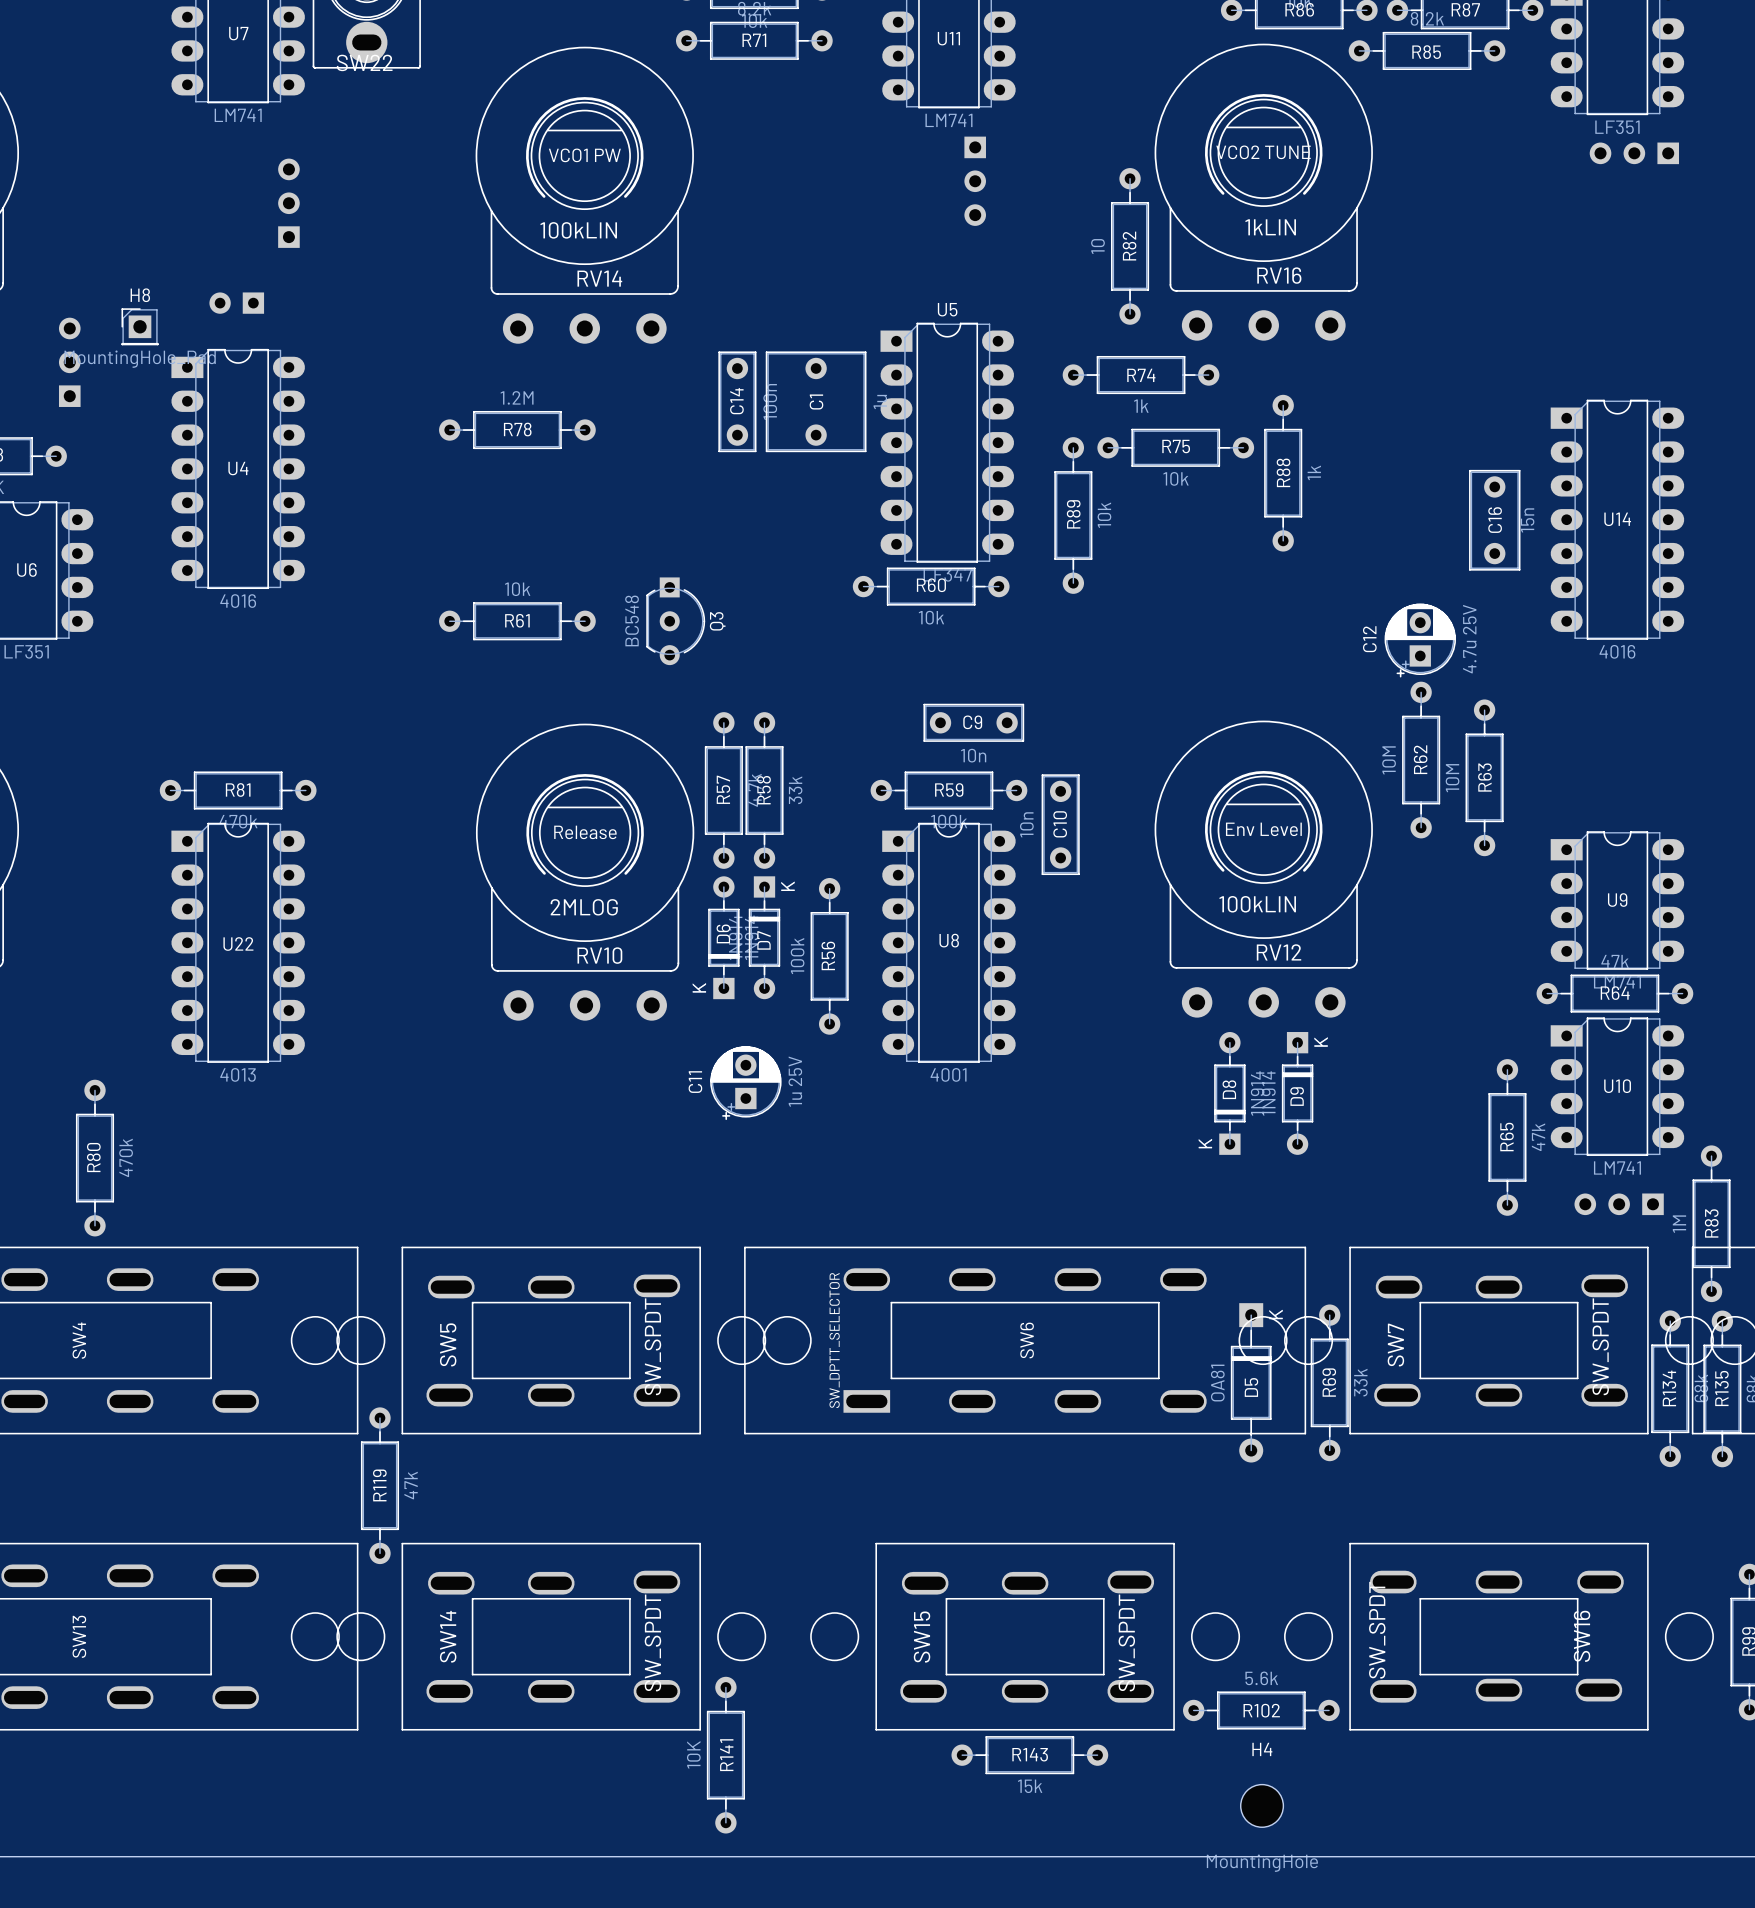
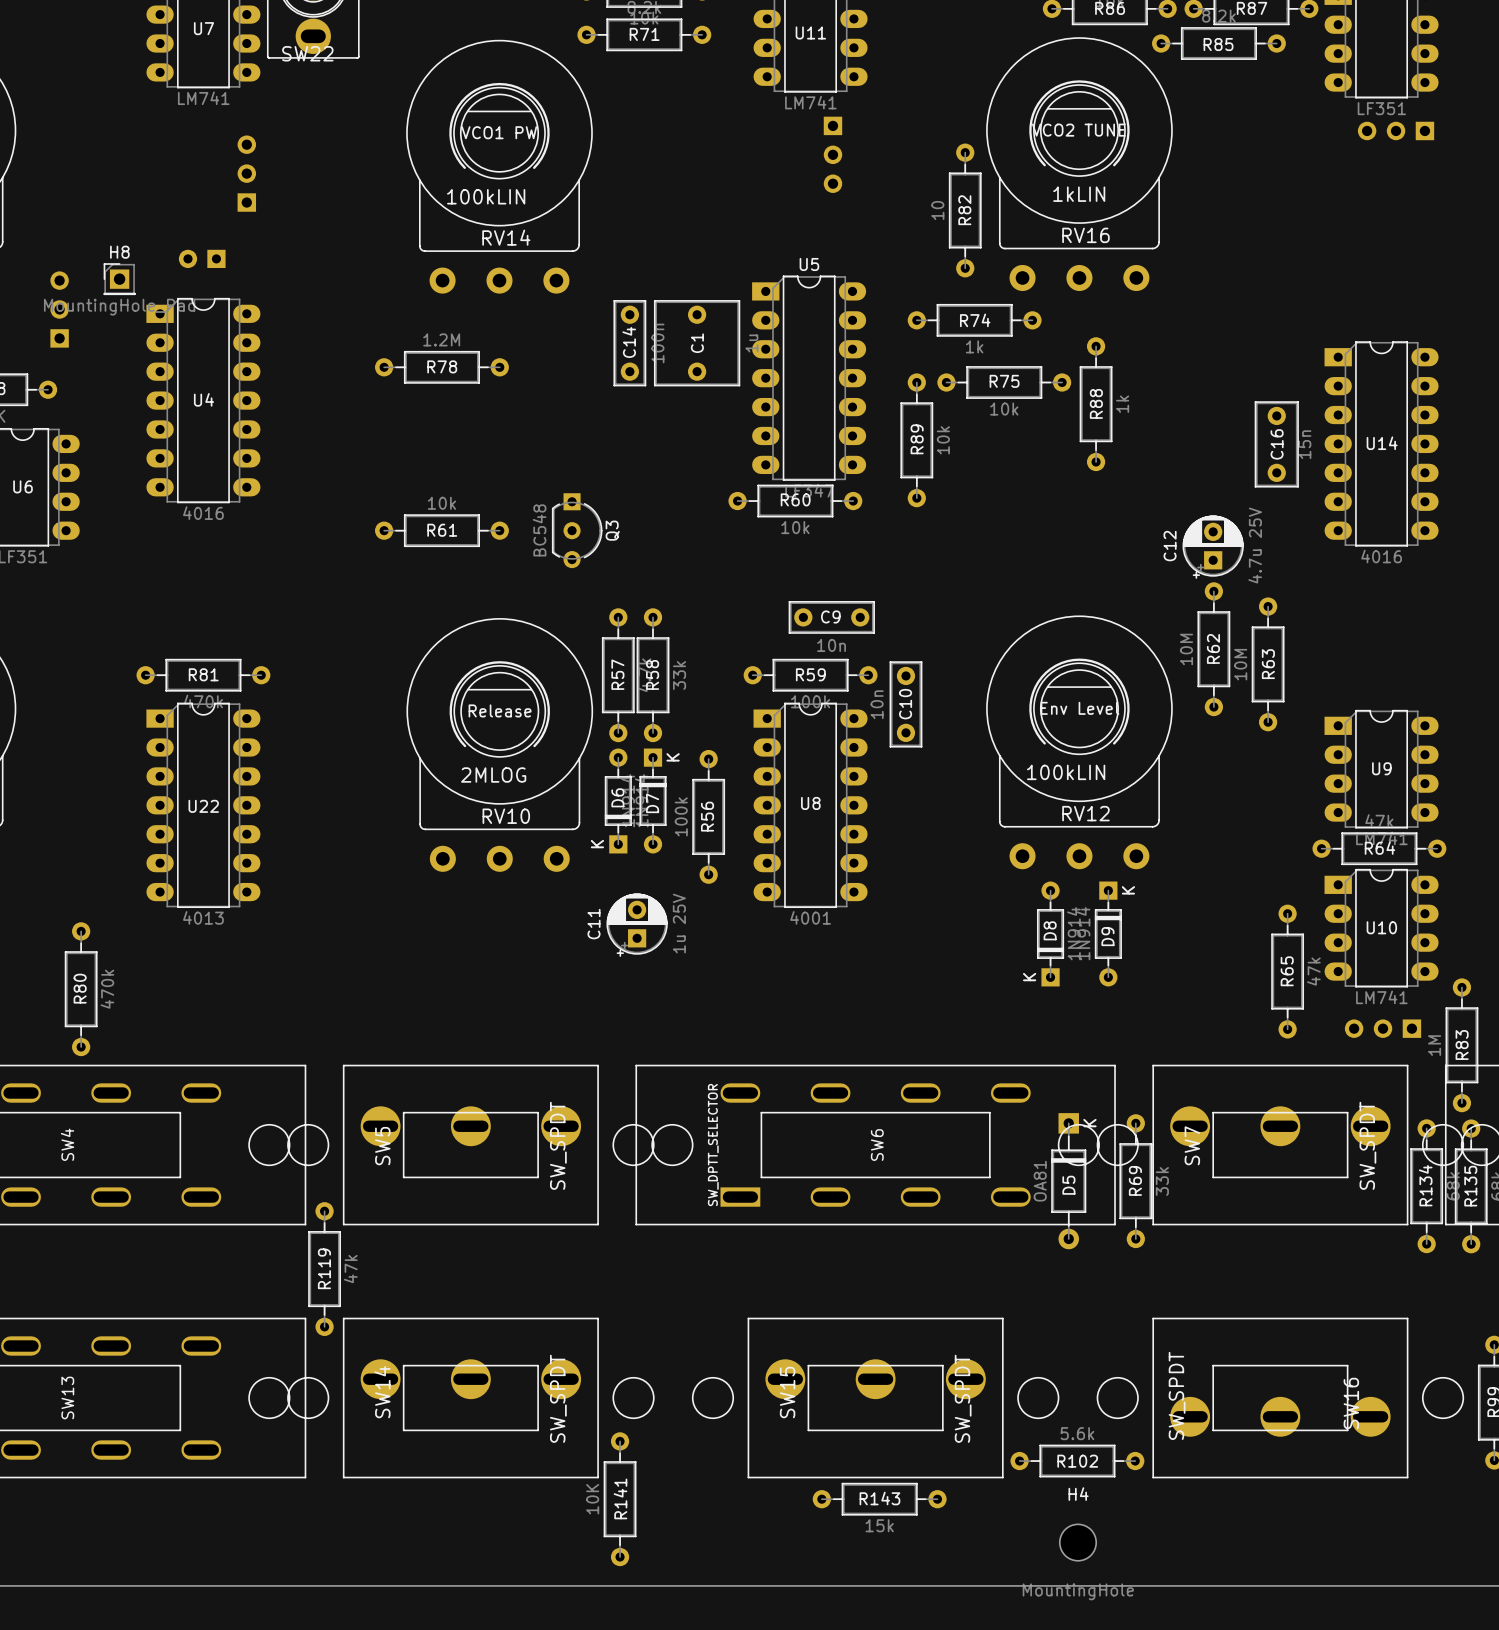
SW5 footprint: [336, 1246, 767, 1435] -> [287, 1064, 655, 1226]
SW7 footprint: [1284, 1246, 1714, 1435] -> [1096, 1064, 1464, 1226]
SW14 footprint: [336, 1542, 767, 1731] -> [287, 1317, 655, 1479]
SW15 footprint: [810, 1542, 1241, 1731] -> [692, 1317, 1060, 1479]
SW16 footprint: [1284, 1542, 1714, 1731] -> [1096, 1317, 1464, 1479]

